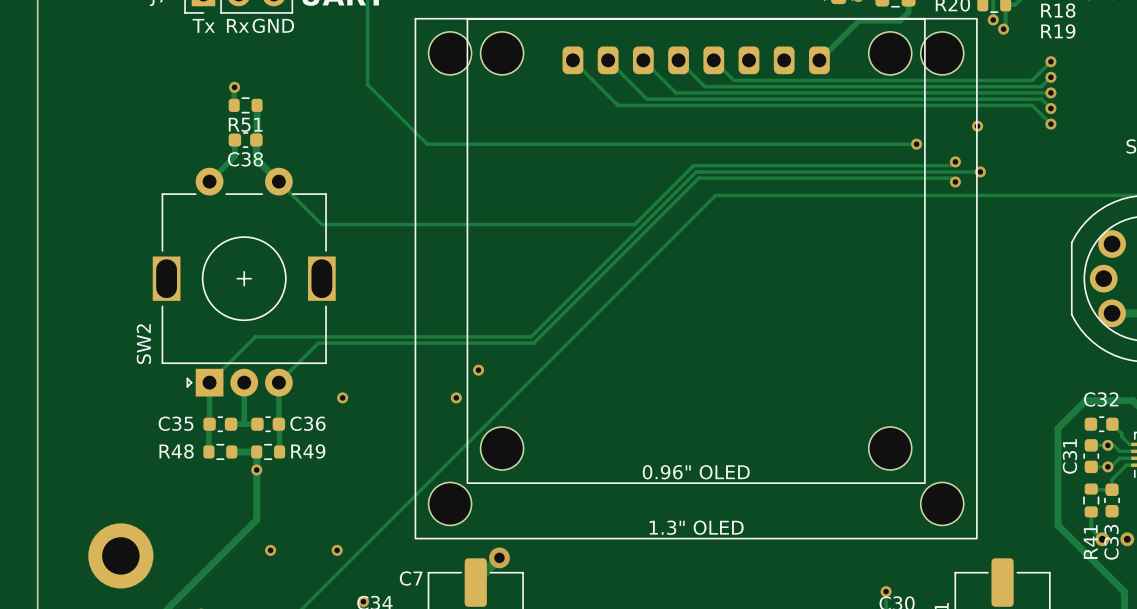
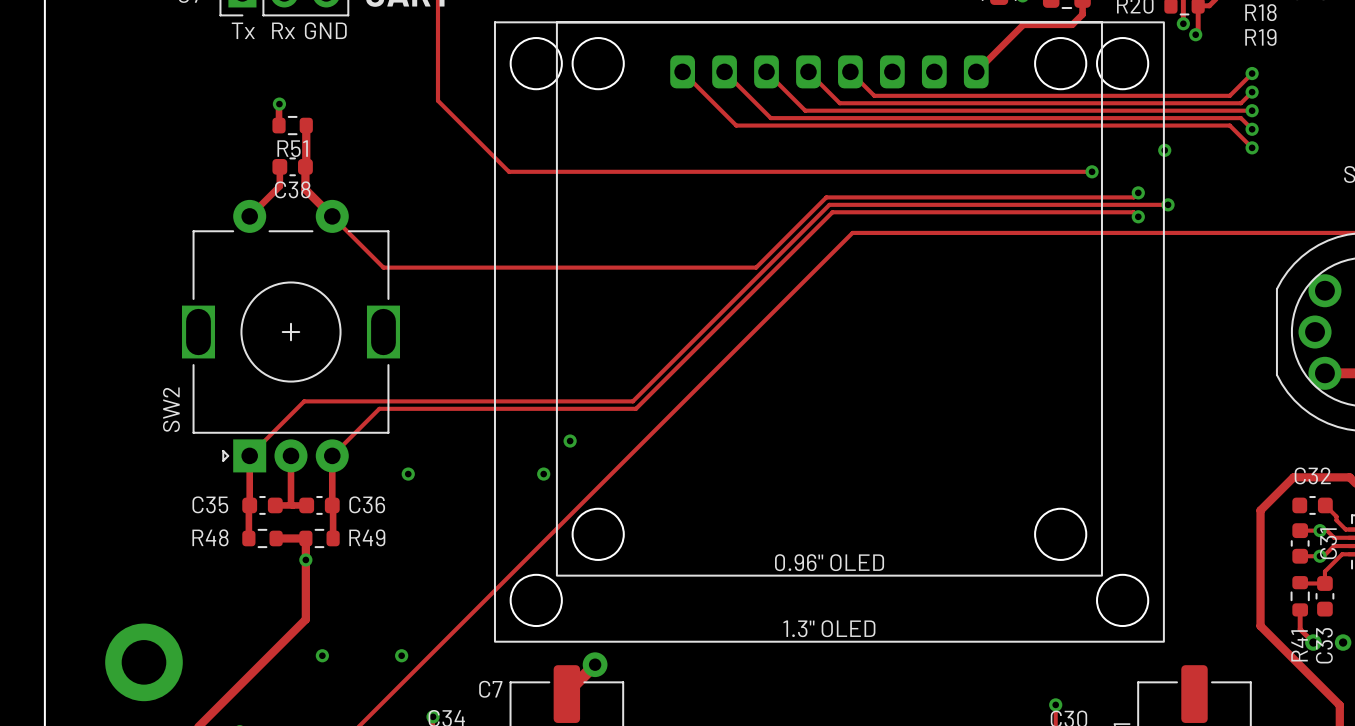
C31 name position: C31 (1069, 456) -> C31 (1328, 543)

